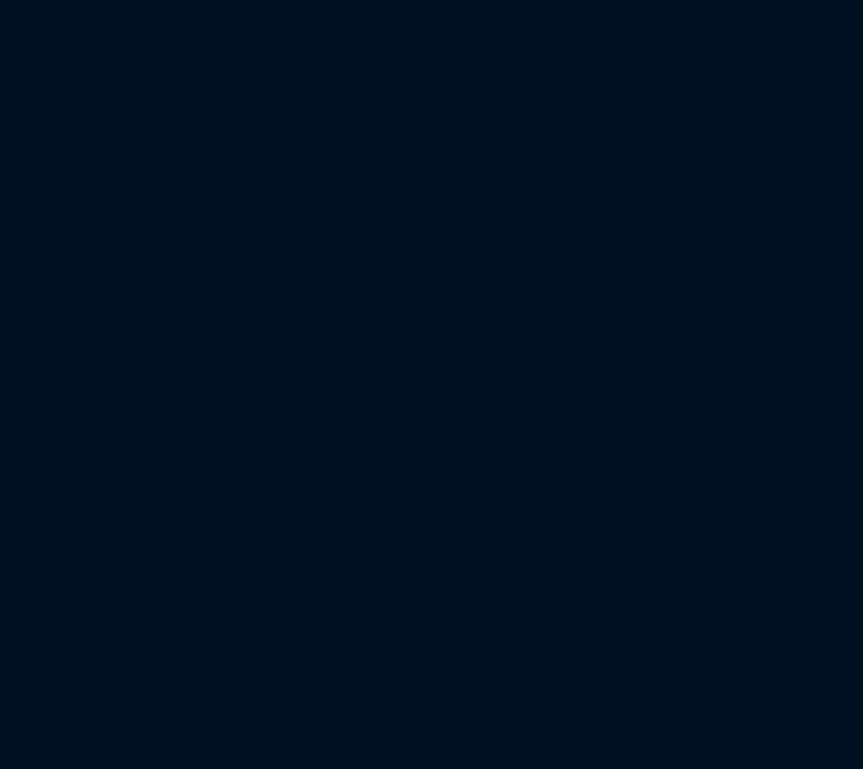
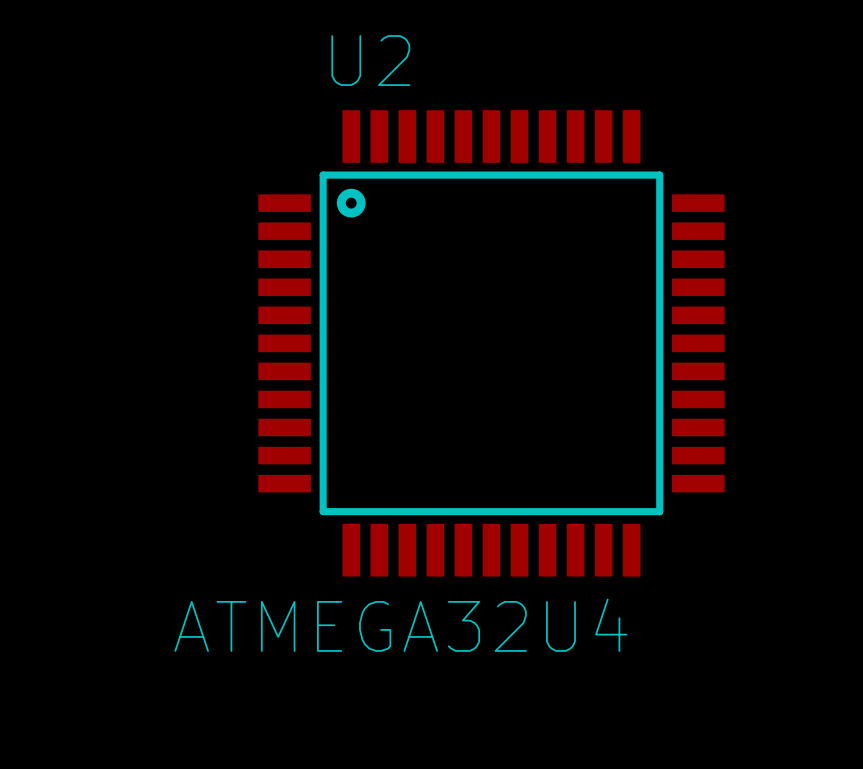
U2: none -> ATMEGA32U4 (491, 343)

